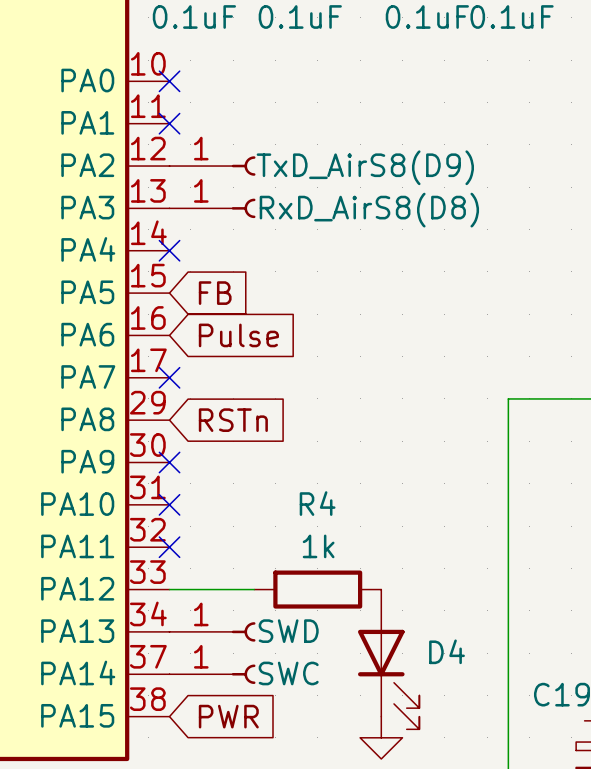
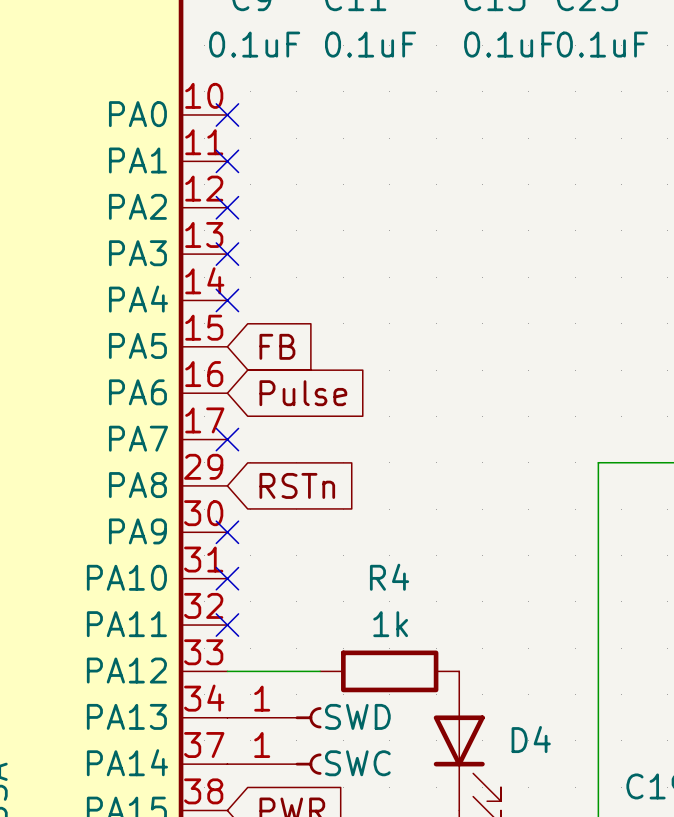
no-connect mark: none -> (227, 207)
part: TxD_AirS8(D9) (212, 166) -> none
no-connect mark: none -> (227, 254)
part: RxD_AirS8(D8) (212, 208) -> none

